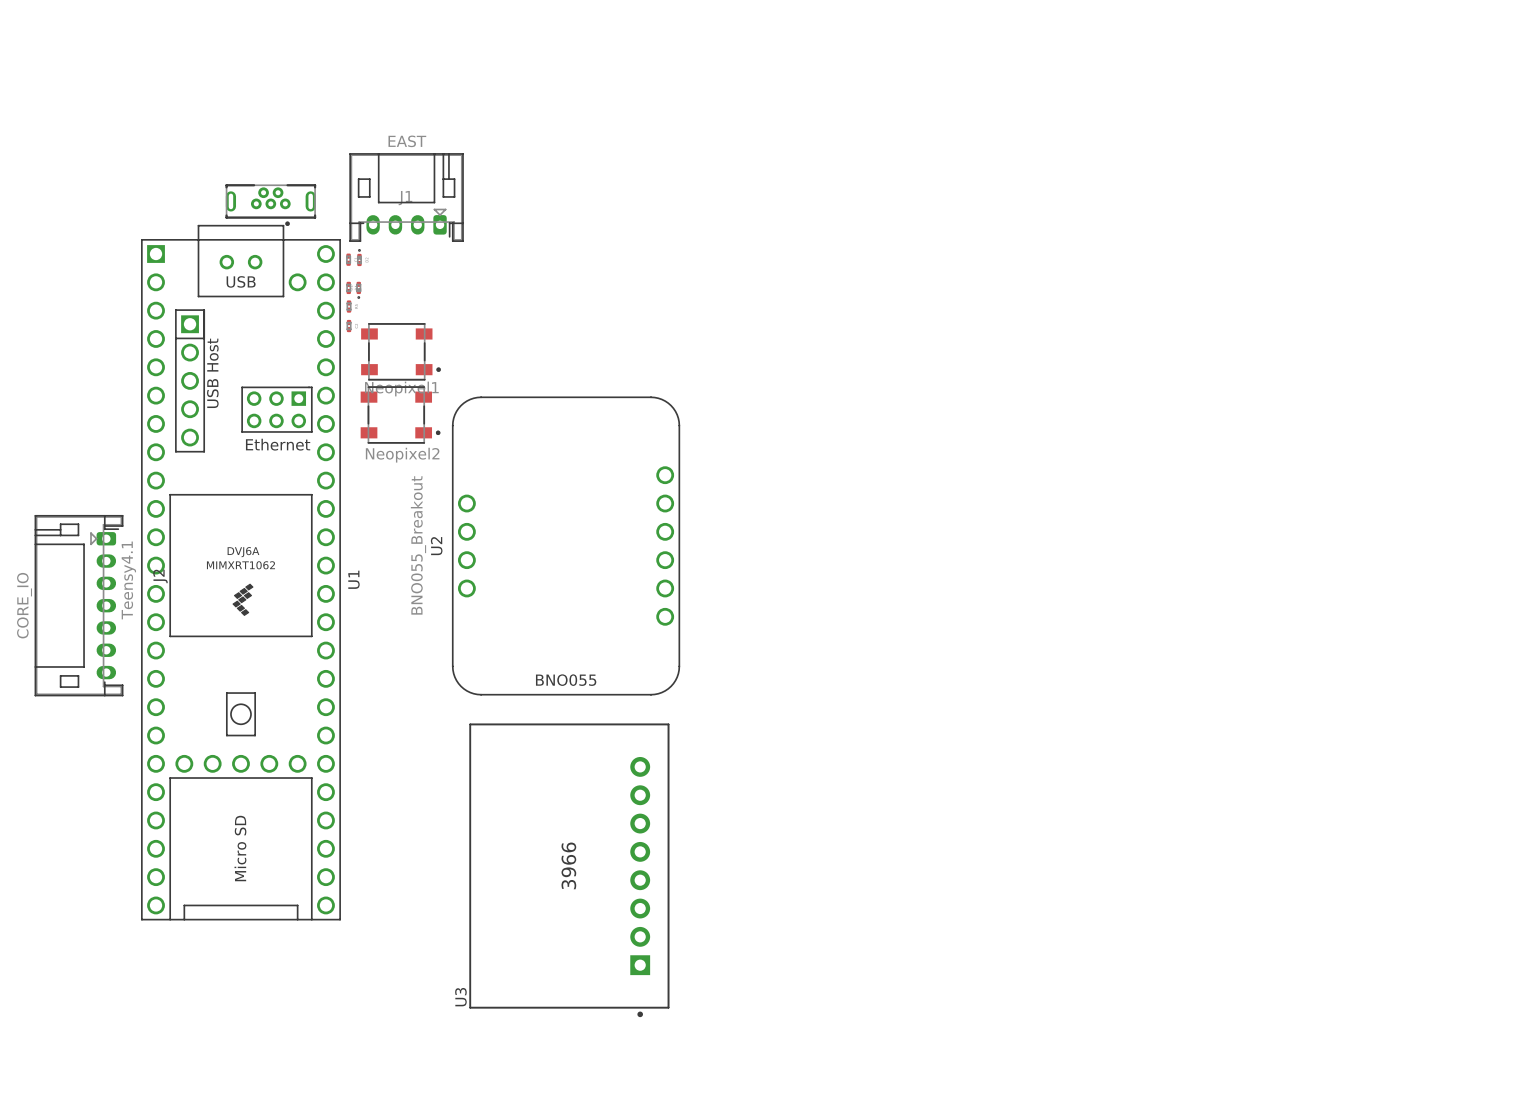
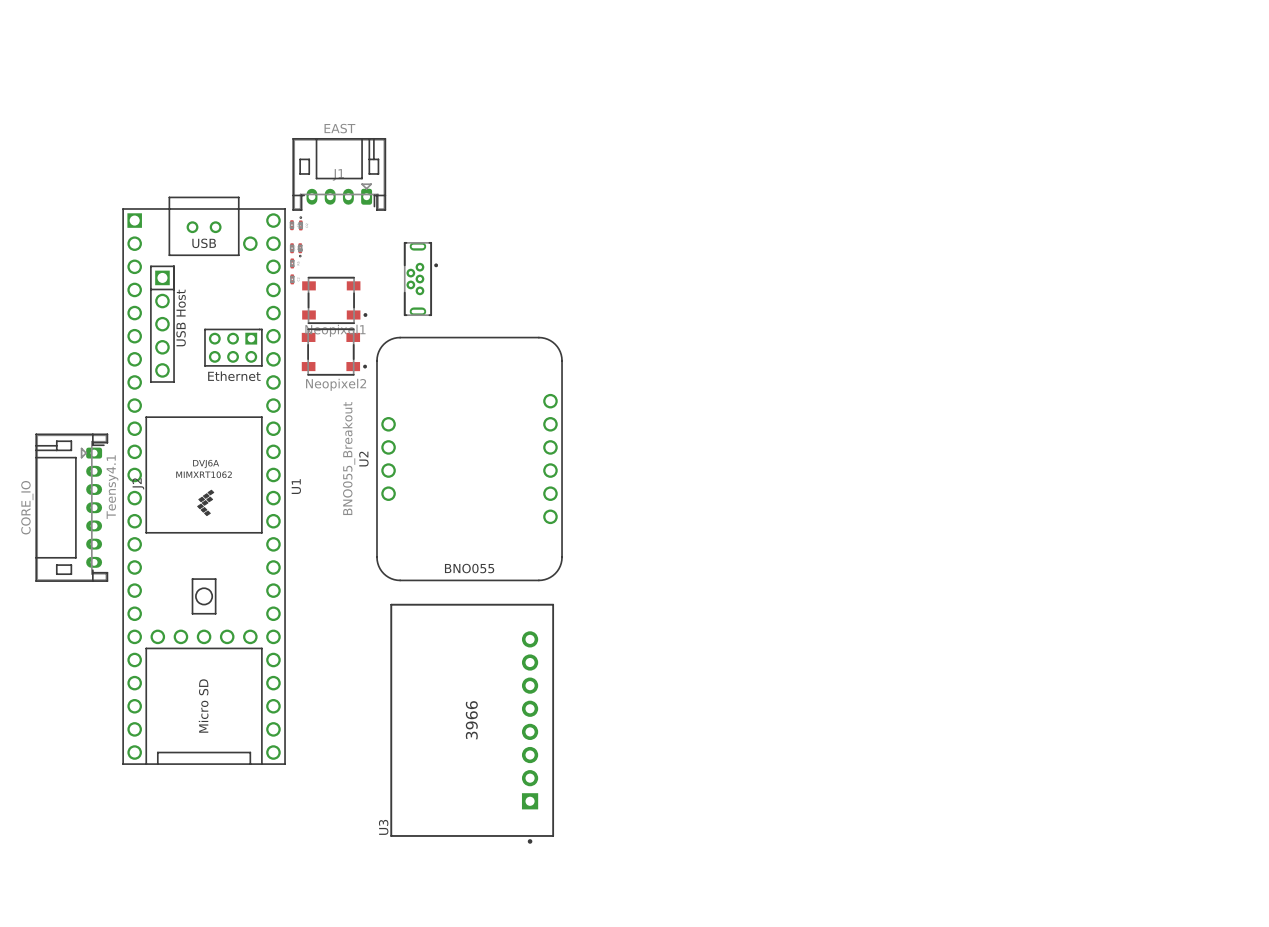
part rotation: 0° (270, 205) -> 90° counterclockwise (420, 279)
part position: (270, 205) -> (420, 279)

